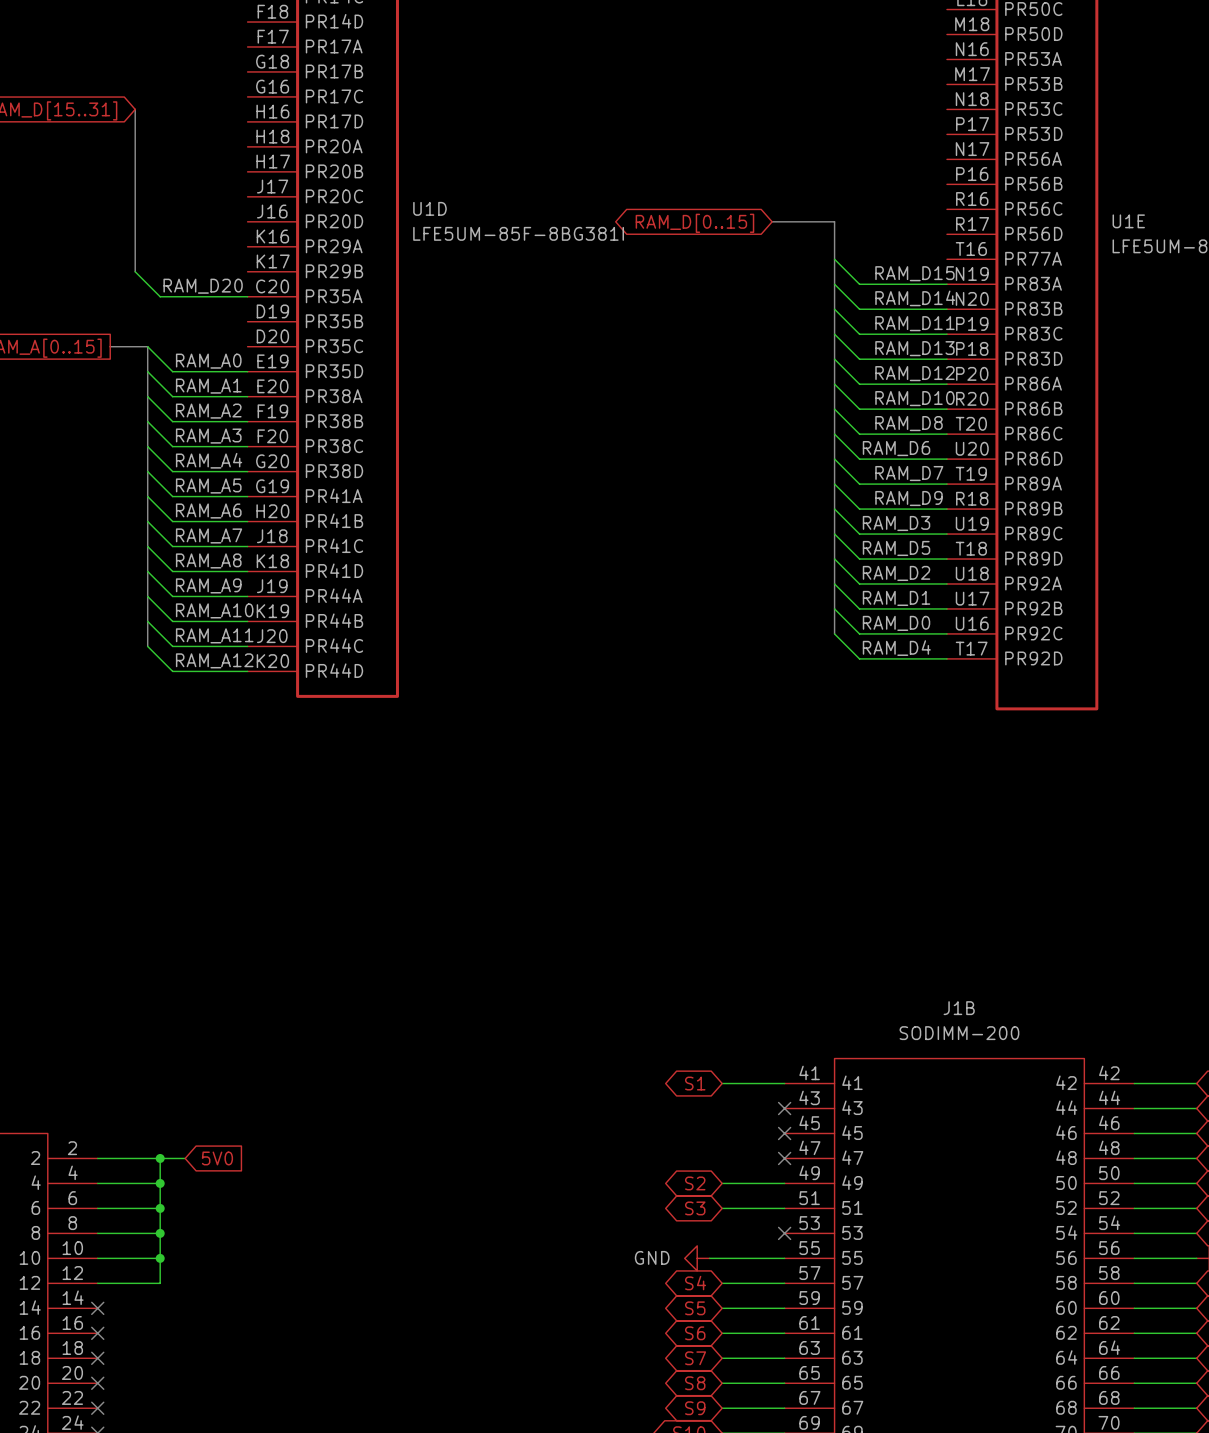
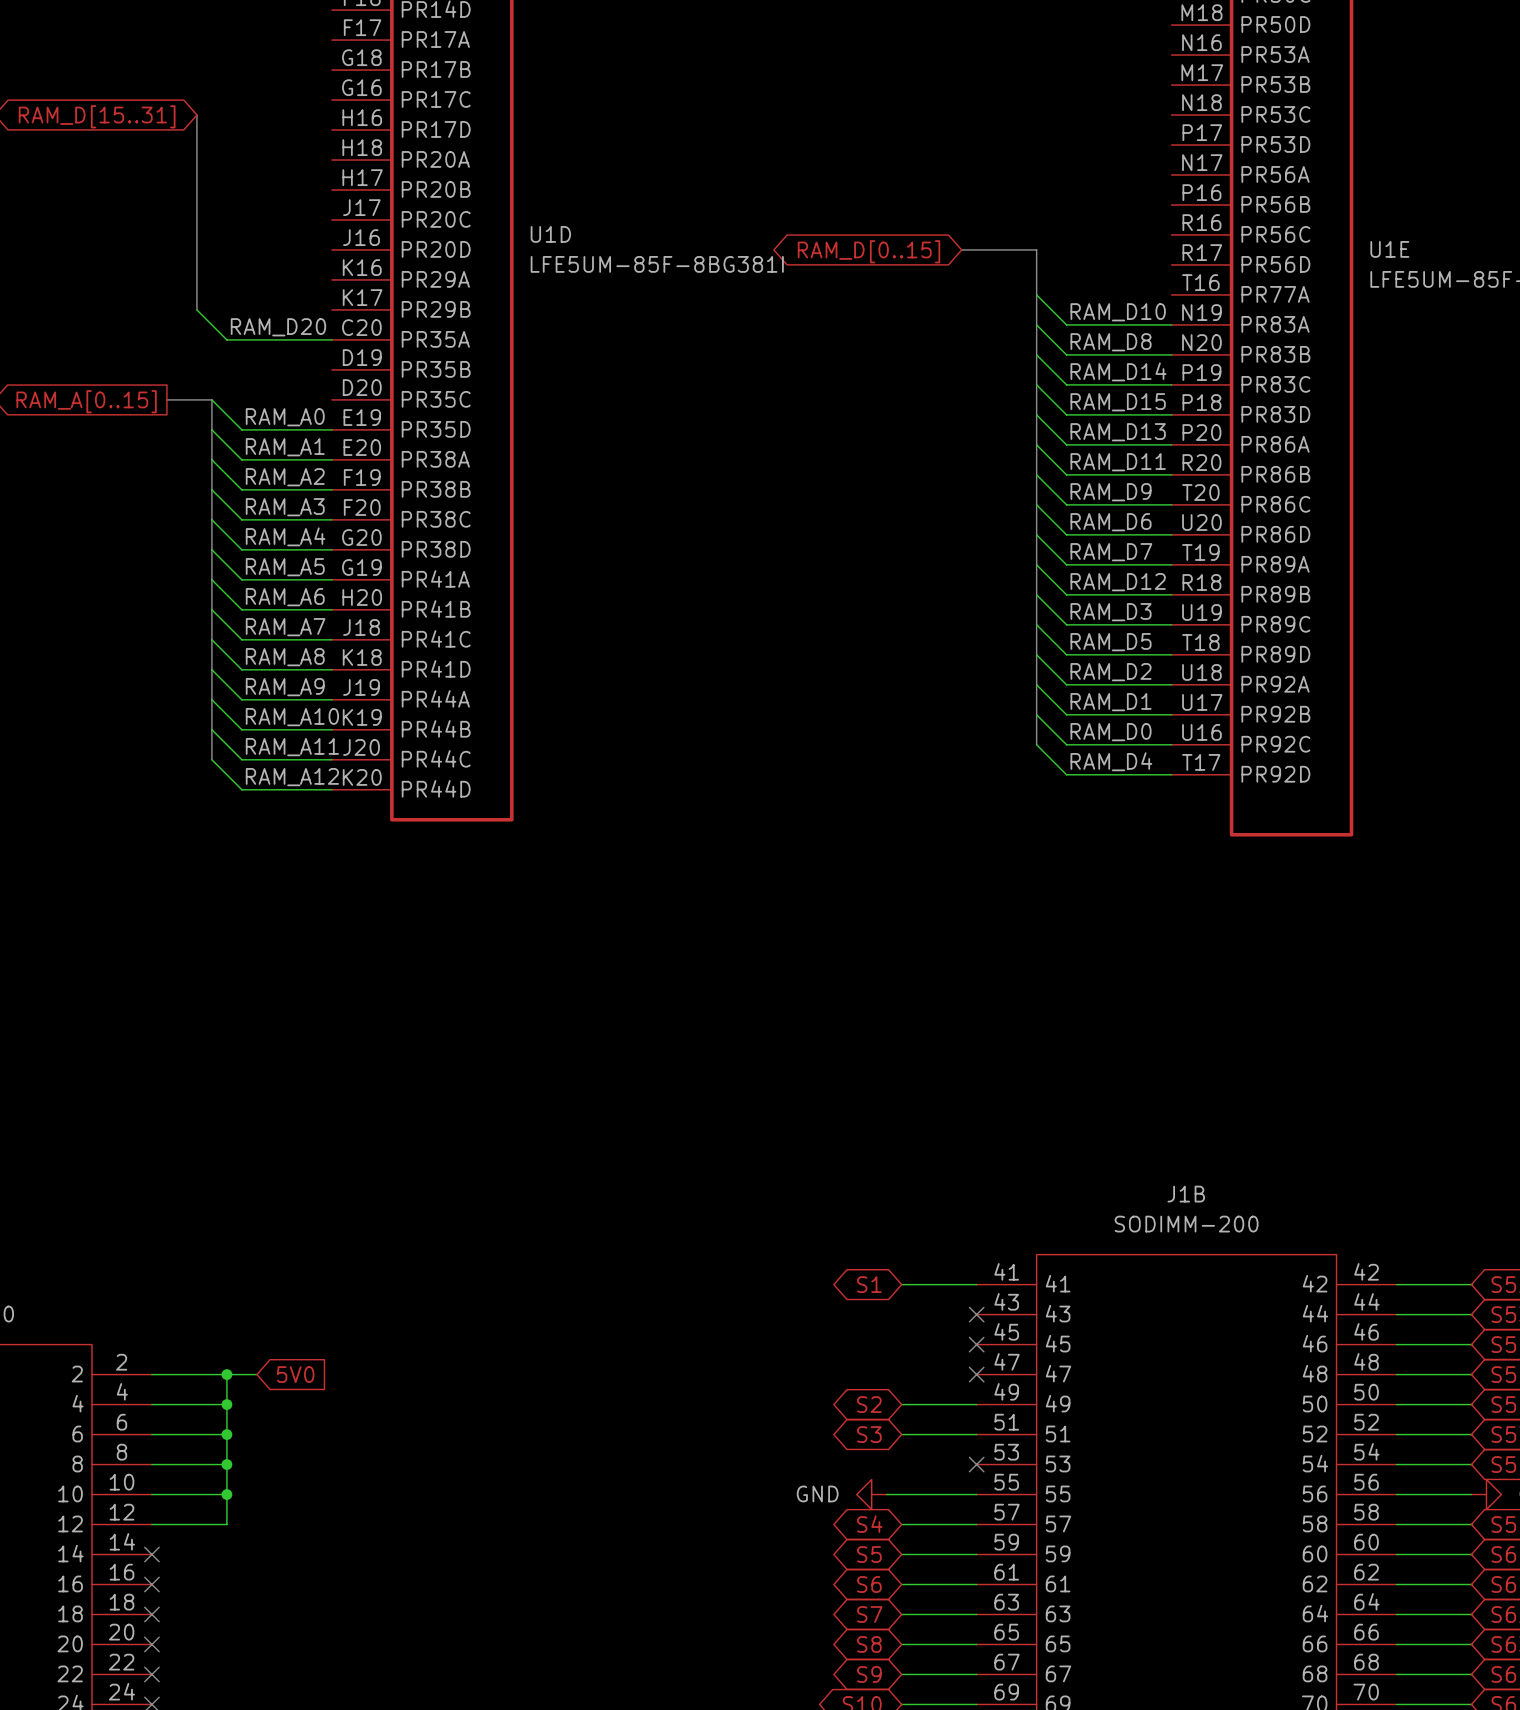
label position: RAM_D15 (914, 273) -> RAM_D15 (1118, 402)
label position: RAM_D14 (915, 298) -> RAM_D14 (1118, 371)
label position: RAM_D11 (914, 323) -> RAM_D11 (1118, 462)
label position: RAM_D13 (914, 348) -> RAM_D13 (1118, 432)
label position: RAM_D12 (914, 373) -> RAM_D12 (1118, 582)
label position: RAM_D10 (914, 398) -> RAM_D10 (1118, 312)
label position: RAM_D8 (909, 423) -> RAM_D8 (1111, 342)
label position: RAM_D7 (909, 473) -> RAM_D7 (1111, 552)
label position: RAM_D9 (909, 498) -> RAM_D9 (1111, 492)

